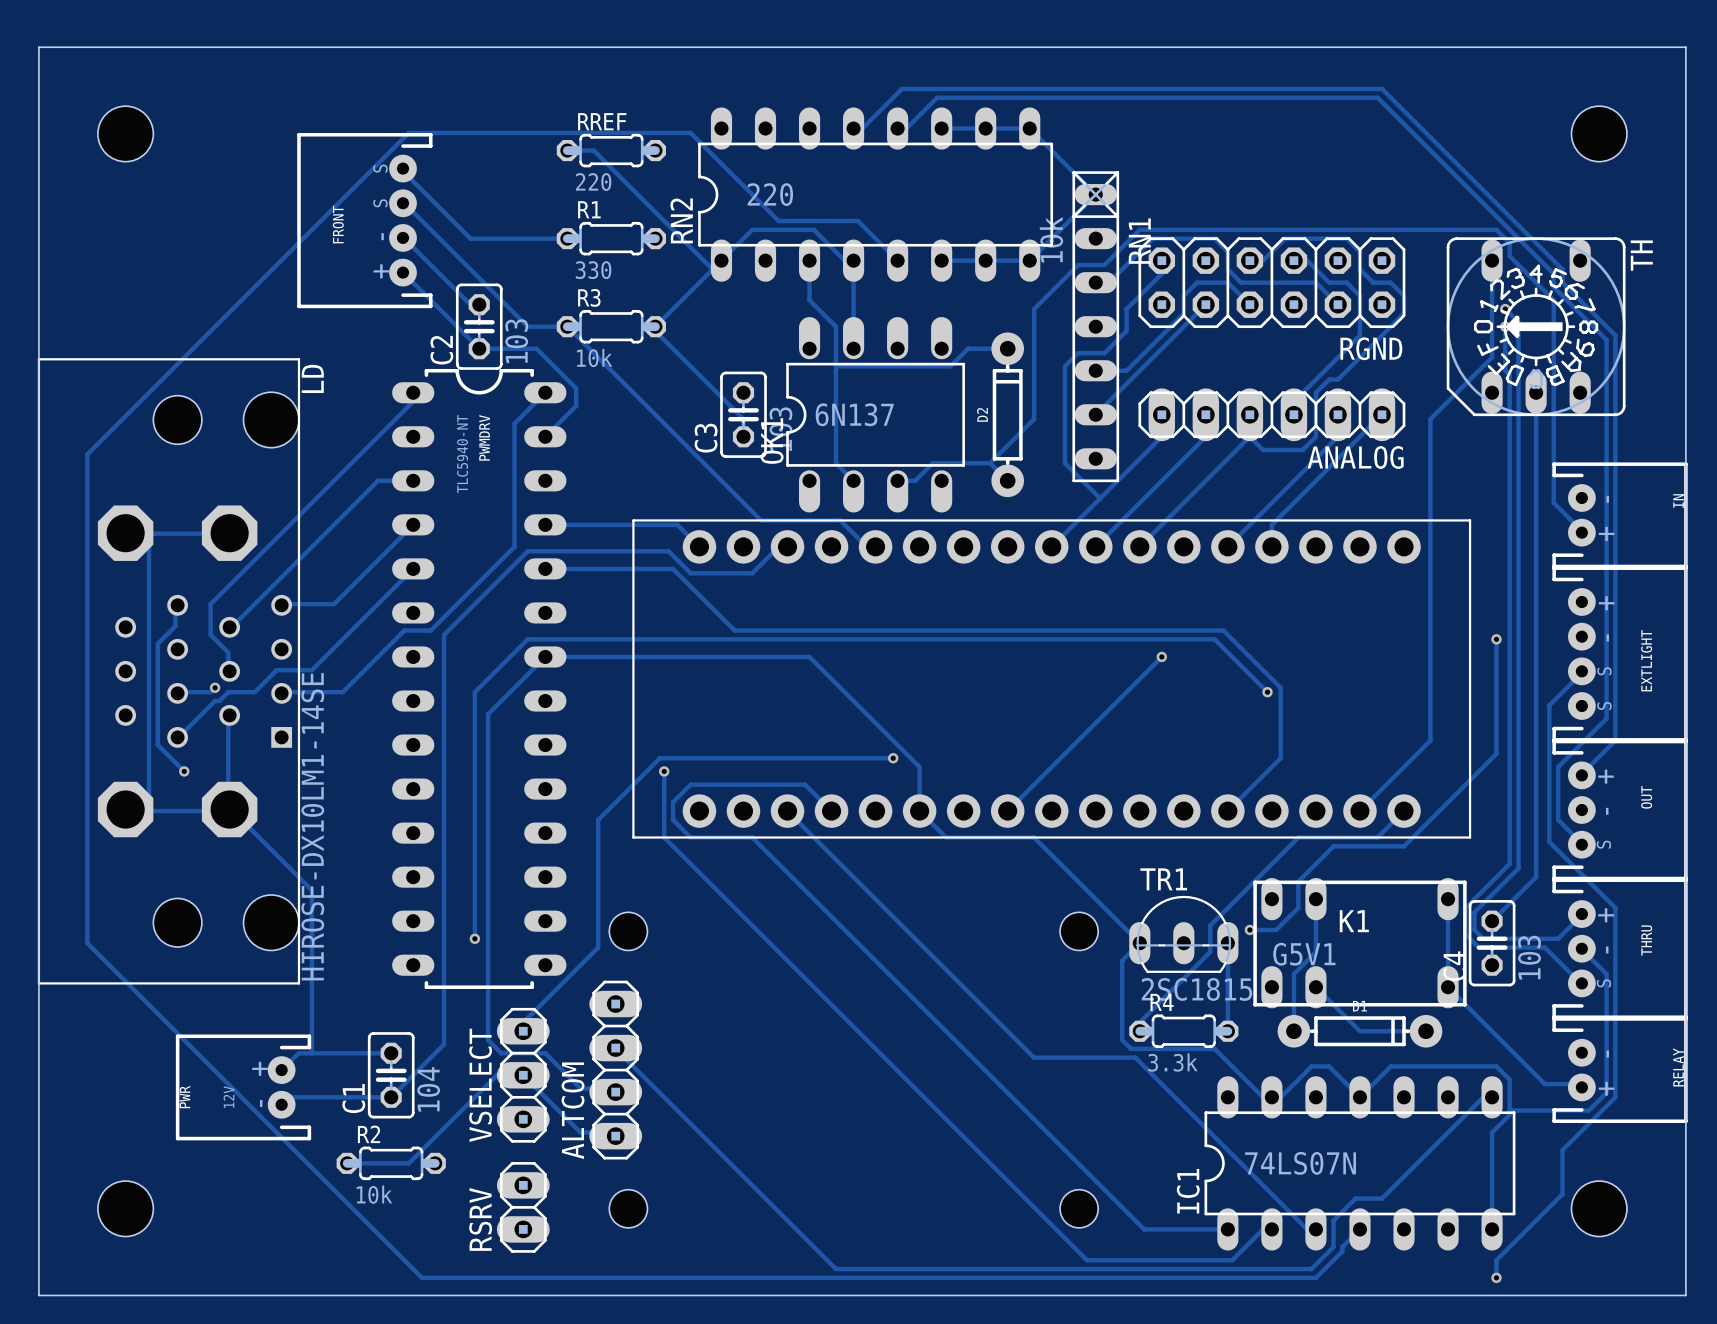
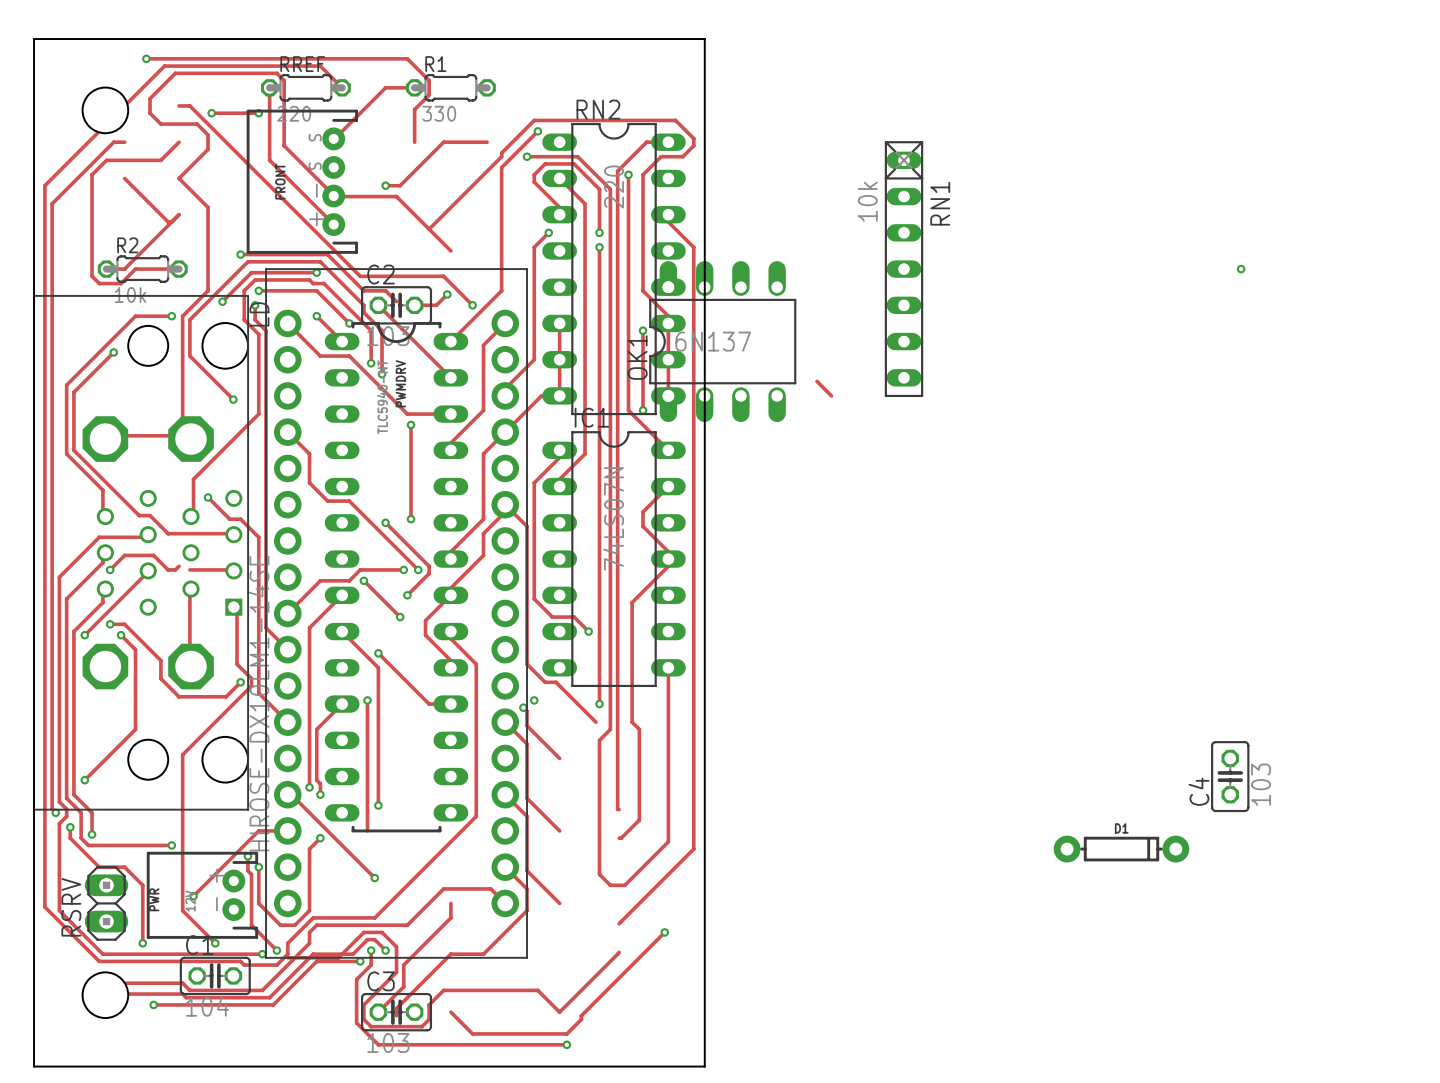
board edge: (853, 47) (1685, 47) (1685, 1295) (853, 1295) -> (704, 39) (704, 1066)
track: none -> (146, 58) (407, 58) (429, 80) (429, 95) (414, 109) (414, 142)
via: none -> (146, 58)
track: none -> (342, 87) (320, 66) (164, 66) (44, 185) (44, 907) (99, 961) (240, 961) (244, 965) (276, 965) (287, 954) (287, 943) (313, 917) (374, 917) (476, 816) (476, 664) (450, 638) (450, 631)
track: none -> (179, 105) (189, 105) (360, 276) (443, 276) (472, 305)
track: (853, 128) (862, 128) (902, 88) (1381, 88) (1562, 269) (1562, 282) (1615, 335) (1615, 740) (1581, 775) -> none
track: (897, 128) (906, 128) (937, 97) (1377, 97) (1553, 273) (1553, 287) (1606, 339) (1606, 718) (1558, 767) (1558, 819) (1581, 844) -> none
track: (941, 128) (1029, 128) (1095, 194) (1029, 260) (941, 260) -> none
hole: (1599, 133) -> none
track: none -> (211, 113) (258, 113)
via: none -> (211, 113)
via: none -> (258, 113)
track: (567, 150) (593, 150) (712, 269) -> none
RREF position: (611, 150) -> (305, 87)
track: none -> (537, 131) (501, 167) (501, 290) (450, 341)
via: none -> (537, 131)
track: (403, 168) (404, 172) (470, 238) -> (333, 138) (385, 87) (414, 87)
track: none -> (124, 142) (113, 142) (52, 203) (52, 809) (55, 812)
track: none -> (179, 142) (160, 160) (106, 160) (92, 174) (92, 276) (99, 283) (121, 283) (135, 269) (179, 269)
track: none -> (487, 142) (443, 142) (400, 185) (385, 185)
track: none -> (668, 142) (646, 142) (617, 171) (617, 809) (619, 809)
track: none -> (527, 156) (577, 156) (610, 189) (610, 729) (599, 740) (599, 874) (610, 885) (624, 885) (668, 841) (668, 667)
via: none -> (527, 156)
RN2 rotation: 0° (875, 194) -> 90° clockwise (614, 269)
track: (403, 203) (527, 326) (567, 326) (761, 520) (840, 520) (866, 546) (875, 546) -> none
track: none -> (628, 174) (628, 410) (668, 450)
via: none -> (628, 174)
track: none -> (124, 178) (168, 221) (171, 221)
track: none -> (559, 178) (585, 203) (585, 453) (559, 479) (559, 486)
via: none -> (385, 185)
track: none -> (333, 196) (284, 145) (284, 80) (276, 73) (175, 73) (150, 98) (150, 113) (160, 124) (197, 124) (208, 134) (208, 149) (179, 178) (208, 207) (208, 290) (182, 316) (182, 428)
track: (404, 238) (470, 304) (479, 304) -> (334, 196) (389, 196)
track: (479, 238) (567, 238) -> (396, 196) (450, 250)
R1 position: (611, 238) -> (450, 87)
track: none -> (179, 214) (124, 269) (106, 269)
track: none -> (559, 214) (559, 207) (534, 182) (534, 174) (545, 163) (574, 163) (599, 189) (599, 232)
track: (897, 260) (857, 221) (778, 221) (690, 132) (408, 132) (87, 454) (87, 476) -> (113, 352) (73, 392)
track: (1161, 260) (1161, 273) (1126, 309) (1126, 331) (1104, 353) (1078, 353) (1064, 366) (1064, 463) (1100, 498) -> none
track: (1249, 260) (1263, 260) (1285, 238) (1346, 238) (1359, 251) (1359, 269) (1373, 282) (1390, 282) (1404, 295) (1404, 313) (1337, 379) (1329, 379) (1315, 392) (1315, 436) (1302, 450) (1263, 450) (1249, 436) -> none
track: (1293, 260) (1307, 260) (1329, 282) (1346, 282) (1359, 295) (1359, 335) (1293, 401) (1293, 414) -> none
track: (1492, 260) (1492, 357) (1430, 419) (1430, 740) (1359, 811) -> none
track: (809, 269) (809, 300) (835, 326) (835, 463) (853, 480) -> (668, 221) (693, 247) (693, 849) (619, 923)
track: (403, 272) (479, 348) (536, 348) (576, 388) (576, 405) (545, 436) -> (333, 224) (269, 160) (269, 87)
track: none -> (429, 229) (501, 156) (501, 153) (534, 120) (675, 120) (693, 138) (693, 145) (682, 156) (661, 156) (643, 174) (643, 290) (668, 316) (668, 395)
track: none -> (548, 232) (534, 247) (534, 359) (505, 388) (505, 395)
via: none -> (548, 232)
via: none -> (599, 232)
track: (1095, 282) (1108, 282) (1153, 238) (1214, 238) (1227, 251) (1227, 269) (1241, 282) (1315, 282) (1337, 304) -> none
RGND: (1271, 282) -> none
track: none -> (599, 247) (599, 704)
via: none -> (599, 247)
track: (1205, 304) (1095, 414) -> none
track: (1249, 304) (1227, 282) (1197, 282) (1183, 295) (1183, 313) (1126, 370) (1095, 370) -> none
track: none -> (240, 254) (327, 254) (363, 290) (385, 290) (396, 301)
via: none -> (240, 254)
track: (1505, 309) (1518, 322) (1518, 868) (1474, 912) (1474, 929) (1483, 938) (1558, 938) (1581, 914) -> none
via: (1505, 309) -> none
C2 rotation: 0° (479, 326) -> 90° clockwise (396, 305)
R3: 10k (611, 326) -> none
track: (1505, 326) (1505, 370) (1509, 375) (1509, 863) (1465, 907) (1465, 934) (1478, 947) (1544, 947) (1581, 983) -> none
TH: (1536, 326) -> none
track: none -> (316, 272) (251, 272) (222, 301)
via: none -> (316, 272)
track: (853, 348) (853, 260) (844, 260) (813, 229) (752, 229) (655, 326) (655, 331) (743, 419) (743, 436) -> none
track: (1007, 348) (968, 348) (950, 366) (835, 366) -> none
track: none -> (258, 290) (316, 290) (349, 323)
via: none -> (258, 290)
track: none -> (447, 294) (436, 305) (414, 305)
via: none -> (447, 294)
via: none -> (222, 301)
track: none -> (255, 305) (255, 319) (266, 330) (266, 627) (287, 649)
via: none -> (255, 305)
track: none -> (378, 305) (450, 377)
via: none -> (472, 305)
track: none -> (171, 316) (135, 316) (66, 385) (66, 453) (102, 490) (102, 515) (105, 516)
via: none -> (171, 316)
track: none -> (316, 316) (342, 341)
via: none -> (316, 316)
track: none -> (287, 323) (320, 356) (349, 356) (407, 414) (450, 414)
track: (413, 392) (413, 401) (311, 502) -> (371, 363) (371, 330) (324, 283) (313, 283) (309, 279) (255, 279) (244, 290) (244, 319) (258, 334) (258, 414)
via: none -> (349, 323)
track: (545, 392) (514, 423) (514, 546) (430, 630) (404, 630) (342, 692) (281, 693) -> none
track: none -> (505, 323) (483, 345) (483, 410) (450, 443) (450, 450)
track: none -> (559, 323) (559, 395) (541, 395) (483, 453) (483, 519) (450, 551) (450, 559)
track: (1536, 392) (1536, 877) (1492, 921) -> none
track: none -> (643, 330) (643, 410)
via: none -> (643, 330)
C3 rotation: 0° (743, 414) -> 90° clockwise (396, 1012)
C3 position: (743, 414) -> (396, 1012)
D2: (1007, 414) -> none
track: (1161, 414) (1161, 436) (1051, 546) -> none
track: (1205, 414) (1205, 436) (1095, 546) -> none
ANALOG: (1271, 414) -> none
track: (1337, 414) (1337, 436) (1227, 546) -> none
track: (1381, 414) (1271, 524) (1271, 546) -> none
via: none -> (113, 352)
track: (1249, 436) (1139, 546) -> none
via: none -> (371, 363)
track: none -> (382, 374) (382, 330) (363, 312) (363, 305) (320, 261) (247, 261) (189, 319) (189, 356) (233, 399)
via: none -> (382, 374)
track: (413, 480) (378, 480) (232, 626) -> none
track: (897, 480) (915, 480) (932, 463) (990, 463) (1034, 419) (1034, 309) (1078, 265) (1104, 265) (1139, 229) (1496, 229) (1509, 243) (1509, 256) (1553, 300) (1553, 502) (1581, 532) -> none
via: none -> (233, 399)
via: none -> (643, 410)
IN: (1620, 515) -> none
track: none -> (411, 424) (411, 519)
via: none -> (411, 424)
track: none -> (182, 428) (175, 435) (106, 435) (105, 439)
track: none -> (287, 432) (309, 453) (309, 482) (327, 501) (349, 501) (418, 569)
track: (413, 524) (333, 604) (281, 605) -> none
track: (545, 524) (677, 524) (699, 546) -> none
track: (229, 533) (125, 533) (149, 533) (149, 811) (125, 809) (127, 811) (228, 811) (229, 809) (311, 890) (311, 1053) -> (320, 838) (309, 849) (309, 910) (295, 925) (280, 925) (258, 903) (258, 867)
track: (87, 546) (87, 767) -> (105, 589) (102, 591) (102, 602) (73, 631)
track: none -> (73, 450) (139, 515) (150, 515) (168, 533) (233, 534)
track: none -> (559, 450) (559, 457) (534, 482) (534, 598) (552, 617) (574, 617) (588, 631)
track: (787, 546) (778, 546) (752, 573) (690, 573) (668, 551) (527, 551) (444, 634) (444, 850) -> none
track: (413, 568) (311, 670) (276, 670) (254, 692) -> (233, 570) (211, 569)
track: (545, 568) (673, 568) (734, 630) (1223, 630) (1280, 687) (1280, 758) (1227, 811) -> none
track: (232, 582) (210, 604) (210, 634) (228, 652) (229, 671) -> (193, 479) (193, 515)
track: none -> (668, 486) (643, 511) (643, 526) (668, 551) (668, 566) (632, 602) (632, 722) (639, 729) (639, 820) (619, 838)
track: none -> (208, 497) (229, 519) (240, 519) (258, 537) (258, 693) (287, 722)
via: none -> (208, 497)
track: (177, 605) (175, 608) (175, 626) (157, 643) (157, 745) (184, 771) -> none
track: none -> (505, 504) (527, 526) (527, 664) (545, 682) (556, 682) (595, 722)
track: none -> (508, 508) (483, 533) (483, 555) (450, 588) (450, 595) (425, 620) (425, 635) (450, 660) (450, 667)
via: none -> (411, 519)
track: none -> (385, 522) (429, 566) (429, 573) (407, 595)
via: none -> (385, 522)
track: (1496, 639) (1496, 753) (1404, 846) (1333, 846) (1298, 881) (1298, 907) (1276, 929) (1249, 929) -> none
via: (1496, 639) -> none
track: none -> (148, 534) (146, 537) (99, 537) (59, 577) (59, 801) (66, 809) (66, 816) (59, 823) (59, 910) (102, 954) (262, 954)
EXTLIGHT: (1620, 654) -> none
track: (1161, 656) (1007, 811) -> none
via: (1161, 656) -> none
track: none -> (105, 552) (102, 555) (102, 562) (66, 598) (66, 798) (81, 812) (81, 838) (88, 845) (171, 845)
track: (1581, 671) (1549, 705) (1549, 841) (1615, 907) (1615, 1097) (1562, 1150) (1562, 1194) (1496, 1260) (1496, 1277) -> none
PWMDRV position: (479, 678) -> (396, 577)
part: (1051, 678) -> none
via: (215, 687) -> none
via: none -> (110, 569)
track: (201, 692) (177, 693) -> (168, 569) (153, 555) (124, 555) (110, 569)
track: (228, 692) (219, 701) (215, 701) (177, 737) -> none
track: none -> (403, 569) (360, 569) (349, 580) (320, 580) (287, 613)
via: none -> (403, 569)
via: none -> (418, 569)
track: (1267, 692) (1214, 639) (527, 639) (474, 692) (474, 938) -> none
via: (1267, 692) -> none
track: none -> (148, 570) (84, 635)
track: none -> (363, 580) (400, 617)
via: none -> (363, 580)
track: none -> (342, 595) (309, 627) (309, 787)
via: none -> (407, 595)
track: none -> (233, 607) (237, 609) (237, 664) (251, 678) (251, 685) (182, 754) (182, 910) (215, 943)
part: none -> (396, 613)
via: none -> (400, 617)
track: none -> (110, 624) (124, 624) (160, 660) (160, 678) (179, 696) (226, 696) (240, 682)
via: none -> (110, 624)
track: (893, 758) (659, 758) (598, 819) (598, 947) (523, 1022) (523, 1031) -> none
via: (893, 758) -> none
track: none -> (342, 631) (378, 667) (378, 805)
via: none -> (588, 631)
via: none -> (84, 635)
track: none -> (121, 635) (135, 649) (135, 729) (84, 780)
via: none -> (121, 635)
via: (184, 771) -> none
track: (664, 771) (664, 837) (1086, 1260) (1232, 1260) (1263, 1229) (1271, 1229) -> none
via: (664, 771) -> none
track: none -> (378, 653) (429, 704) (450, 704)
via: none -> (378, 653)
OUT: (1620, 810) -> none
track: (787, 811) (1034, 1057) (1135, 1057) (1307, 1229) (1315, 1229) -> none
track: (831, 811) (805, 784) (690, 784) (673, 802) (673, 819) (690, 837) (752, 837) (1144, 1229) (1227, 1229) -> none
track: (1404, 811) (1377, 837) (1298, 837) (1210, 925) (1210, 951) (1139, 1022) (1139, 1031) -> none
via: none -> (240, 682)
via: none -> (367, 700)
via: none -> (534, 700)
track: none -> (342, 704) (316, 729) (316, 780) (320, 783) (320, 794)
via: none -> (599, 704)
track: none -> (523, 707) (527, 711) (527, 725) (559, 758)
via: none -> (523, 707)
track: none -> (505, 722) (527, 743) (527, 798) (559, 830)
track: (1315, 899) (1315, 951) (1293, 974) (1293, 1031) -> none
track: (1448, 899) (1448, 987) (1544, 1084) (1580, 1084) (1581, 1087) -> none
via: (1249, 929) -> none
hole: (628, 931) -> none
hole: (1079, 931) -> none
TR1: 2SC1815 (1183, 934) -> none
via position: (474, 938) -> (378, 805)
track: (87, 943) (422, 1277) (1315, 1277) (1342, 1251) (1342, 1247) (1359, 1229) -> (73, 776) (73, 794) (92, 812) (92, 834)
track: (1227, 943) (1227, 1031) -> none
K1: G5V1 (1359, 943) -> none
via: none -> (84, 780)
track: (1581, 948) (1606, 974) (1606, 1092) (1588, 1110) (1509, 1110) -> none
THRU: (1620, 948) -> none
via: none -> (309, 787)
track: none -> (287, 794) (291, 794) (374, 878)
via: none -> (320, 794)
track: none -> (505, 794) (527, 816) (527, 870) (559, 903)
via: none -> (55, 812)
track: (1315, 987) (1359, 1031) (1426, 1031) -> none
track: none -> (70, 827) (70, 838) (99, 867) (124, 867) (142, 885) (142, 943)
via: none -> (70, 827)
track: none -> (287, 830) (258, 830) (193, 896)
track: (444, 1009) (444, 1044) (391, 1097) (289, 1097) (281, 1104) -> none
via: none -> (92, 834)
via: none -> (320, 838)
via: none -> (171, 845)
R4: 3.3k (1183, 1031) -> none
track: none -> (247, 856) (247, 870) (251, 874) (251, 925) (276, 950)
via: none -> (247, 856)
track: (615, 1048) (835, 1269) (1311, 1269) (1333, 1247) (1333, 1220) (1355, 1198) (1381, 1198) (1483, 1097) (1492, 1097) -> none
via: none -> (258, 867)
track: (391, 1053) (298, 1053) (281, 1070) -> none
track: none -> (505, 867) (527, 888) (527, 910) (483, 954) (450, 954) (396, 1008) (396, 1015)
via: none -> (374, 878)
ALTCOM: (615, 1070) -> none
RELAY: (1620, 1070) -> none
C1 rotation: 0° (391, 1075) -> 90° clockwise (215, 975)
C1 position: (391, 1075) -> (215, 975)
VSELECT: (523, 1075) -> none
via: none -> (193, 896)
track: (615, 1092) (611, 1088) (580, 1088) (545, 1053) (501, 1053) (488, 1040) (488, 714) (545, 656) (809, 656) (919, 767) (919, 811) (946, 837) (1034, 837) (1139, 943) (1122, 960) (1122, 1040) (1130, 1048) (1214, 1048) (1263, 1097) (1280, 1097) (1311, 1066) (1329, 1066) (1359, 1097) (1390, 1066) (1496, 1066) (1509, 1079) (1509, 1114) (1492, 1132) (1492, 1229) -> none
track: none -> (450, 903) (450, 917) (403, 965) (403, 986) (378, 1012)
track: none -> (505, 903) (490, 888) (443, 888) (407, 925) (316, 925) (309, 932) (309, 943) (262, 990) (189, 990) (182, 983) (117, 983)
track: (439, 1132) (496, 1075) (523, 1075) (580, 1132) (611, 1132) (615, 1136) -> (363, 932) (382, 932) (396, 946) (396, 972) (363, 1004) (363, 1019) (371, 1026) (421, 1026) (429, 1019) (429, 1004) (443, 990) (537, 990) (559, 1012) (619, 952)
track: none -> (664, 932) (581, 1015) (581, 1019) (566, 1033) (472, 1033) (450, 1012)
via: none -> (664, 932)
via: none -> (142, 943)
via: none -> (215, 943)
via: none -> (276, 950)
track: none -> (371, 950) (371, 965) (356, 979) (356, 1023) (378, 1044) (566, 1044)
via: none -> (371, 950)
track: none -> (385, 950) (374, 939) (367, 939) (353, 954) (313, 954) (269, 997) (186, 997) (182, 994) (128, 994)
via: none -> (385, 950)
via: none -> (262, 954)
R2 position: (391, 1163) -> (142, 269)
IC1 rotation: 0° (1359, 1163) -> 90° clockwise (614, 559)
IC1 position: (1359, 1163) -> (614, 559)
track: none -> (360, 961) (316, 961) (273, 1004) (153, 1004)
via: none -> (360, 961)
RSRV position: (523, 1207) -> (106, 903)
hole: (628, 1208) -> none
hole: (1079, 1208) -> none
hole: (1599, 1208) -> none
via: none -> (153, 1004)
via: none -> (566, 1044)
via: (1496, 1277) -> none

